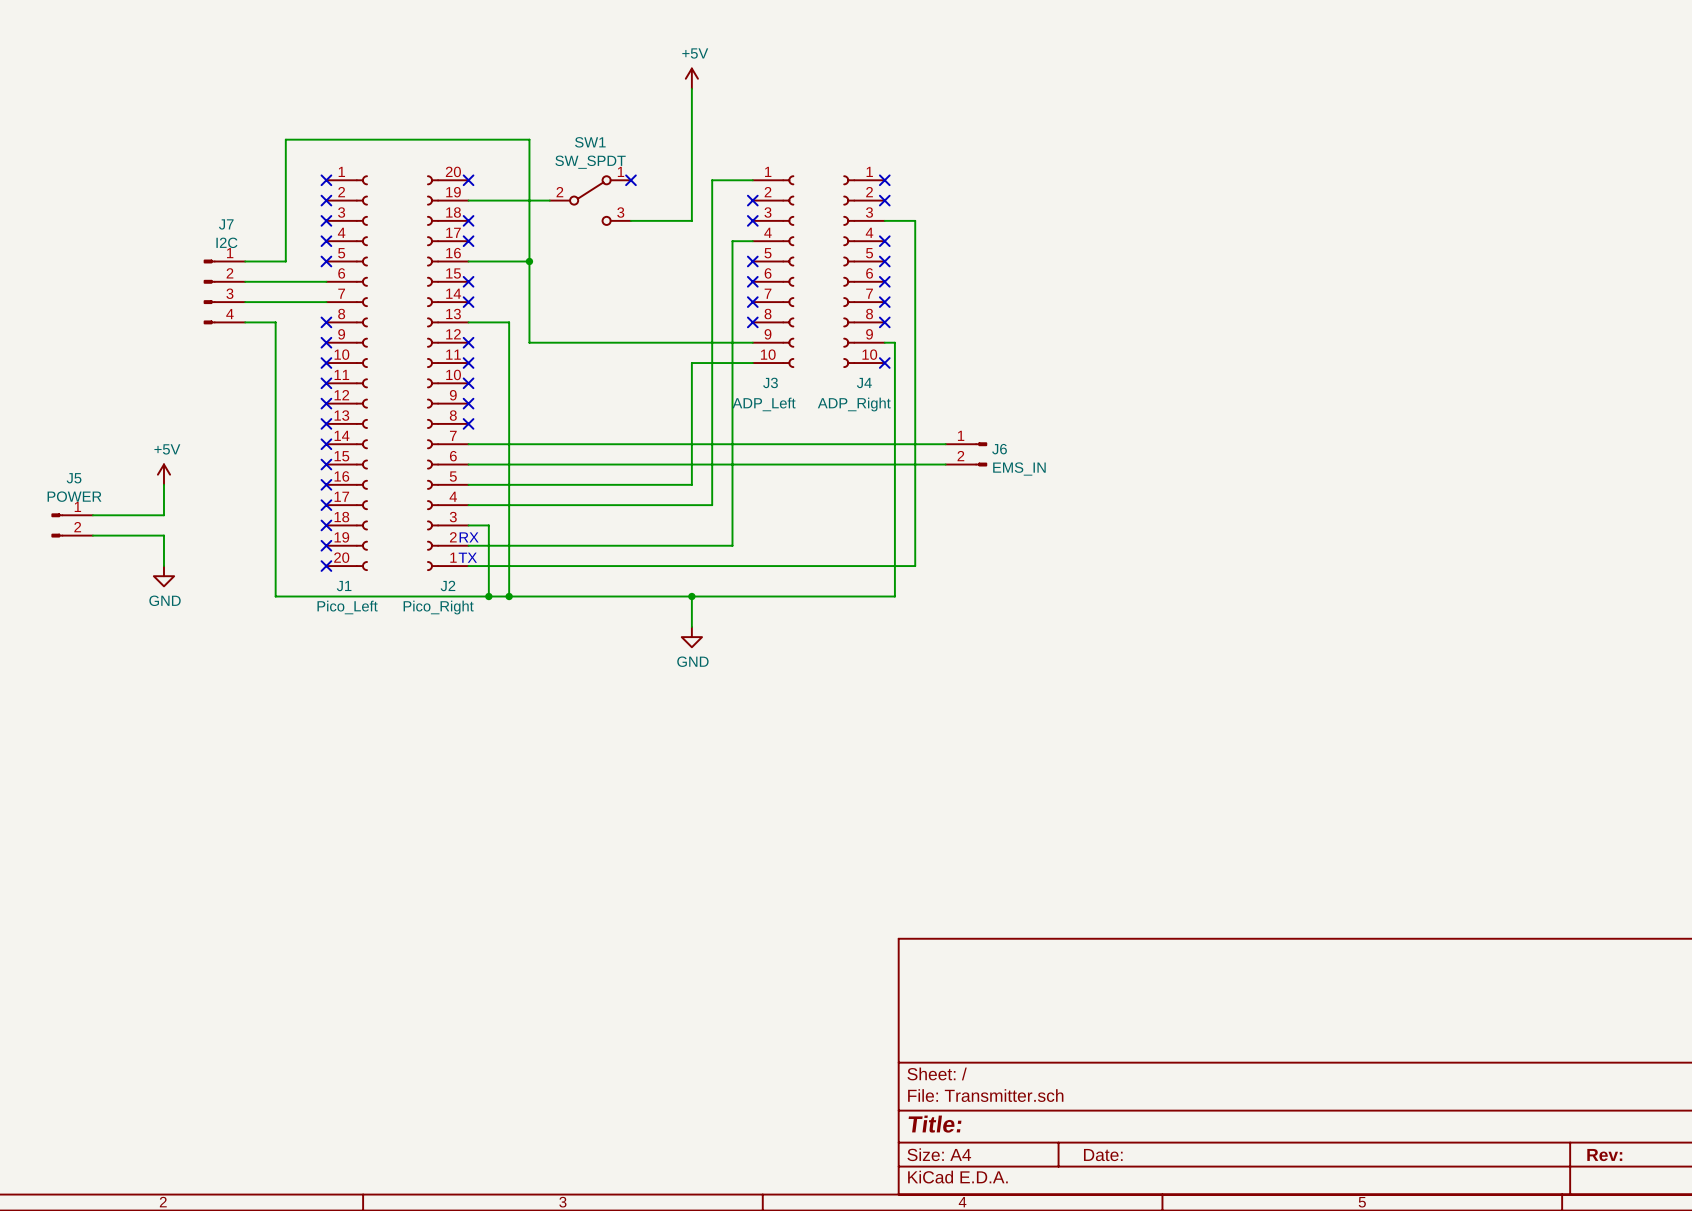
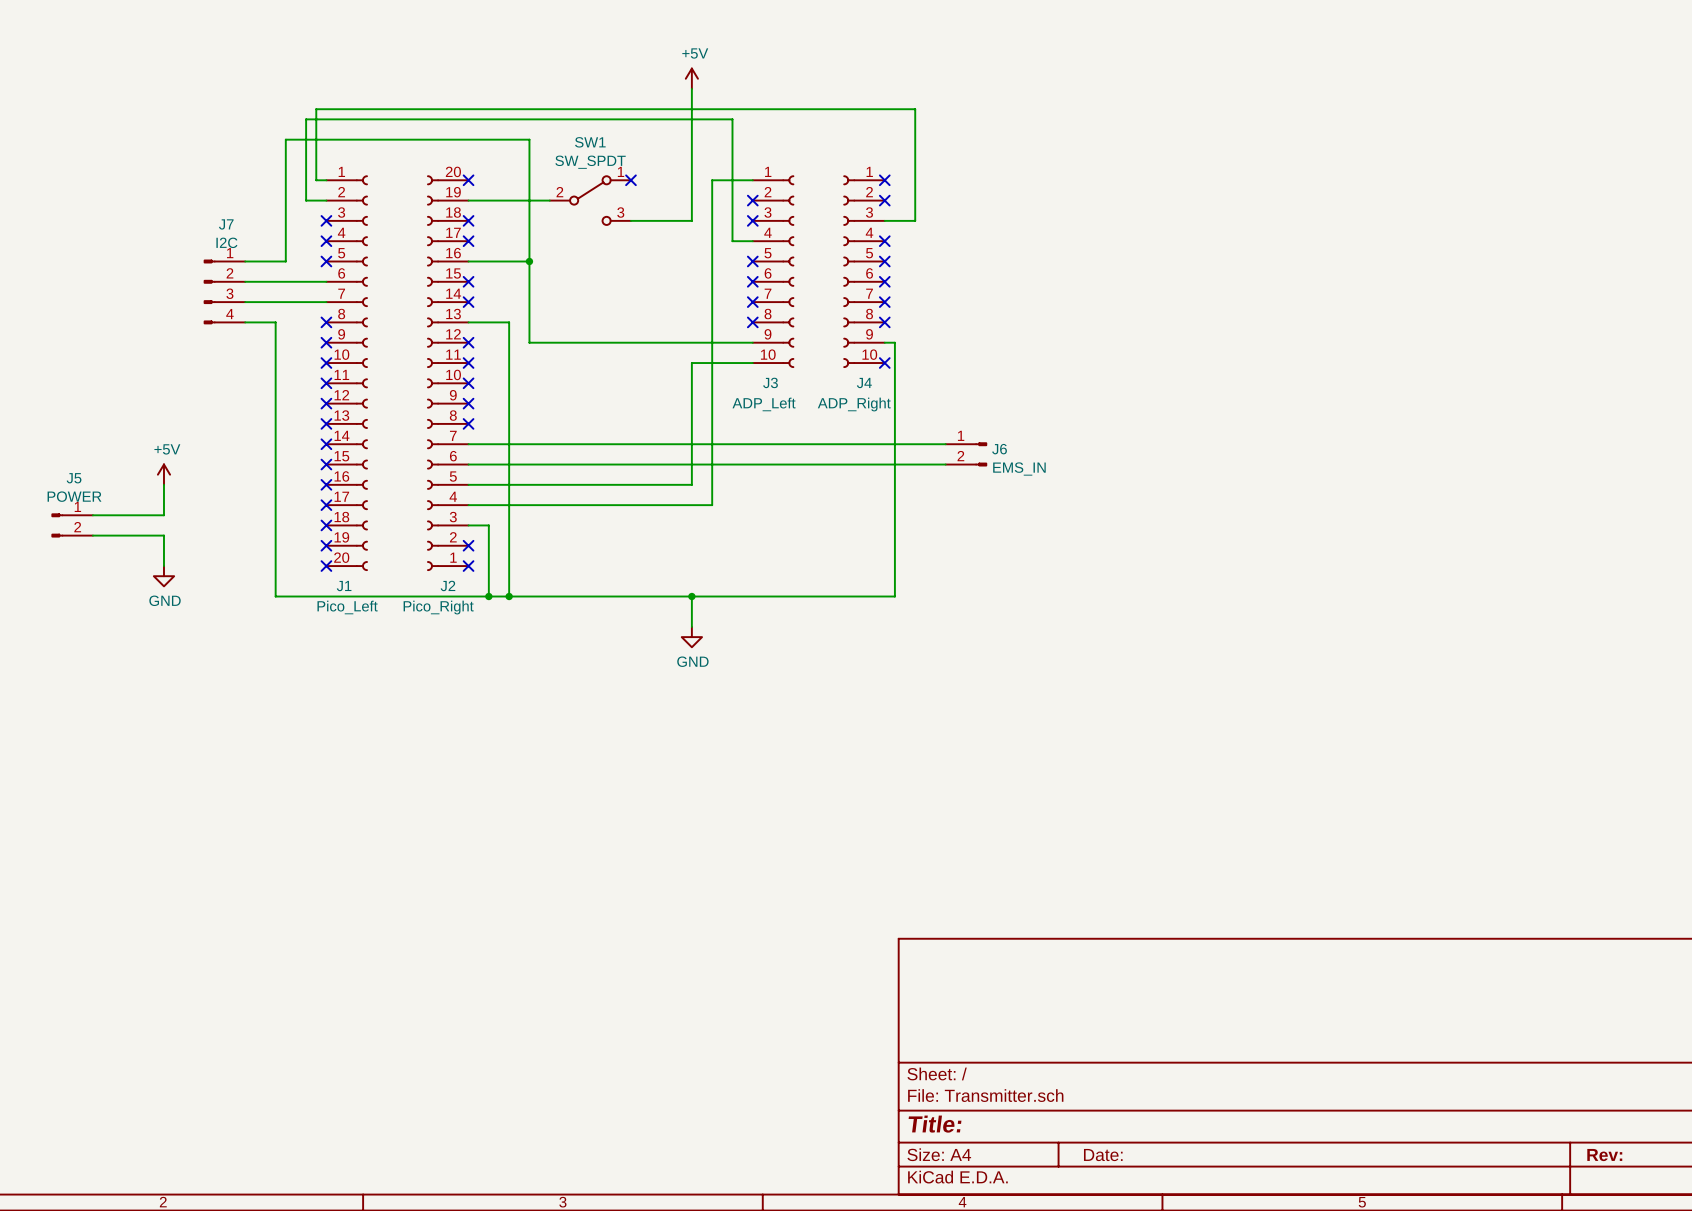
no-connect mark: (326, 180) -> none
no-connect mark: (326, 200) -> none
wire: (915, 220) (915, 566) (468, 566) -> (915, 220) (915, 109) (316, 109) (316, 180) (326, 180)
wire: (732, 241) (732, 545) (468, 545) -> (732, 241) (732, 119) (306, 119) (306, 200) (326, 200)
text: RX (469, 537) -> none
no-connect mark: none -> (468, 545)
text: TX (467, 557) -> none
no-connect mark: none -> (468, 566)

